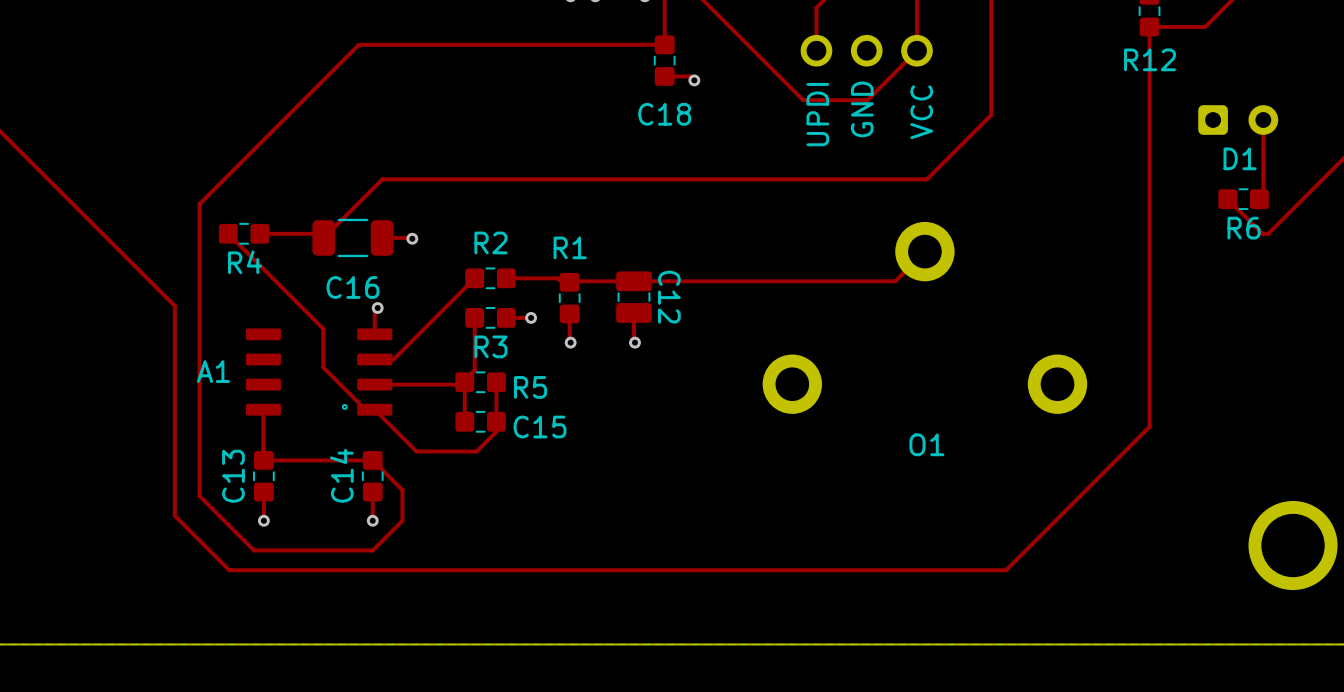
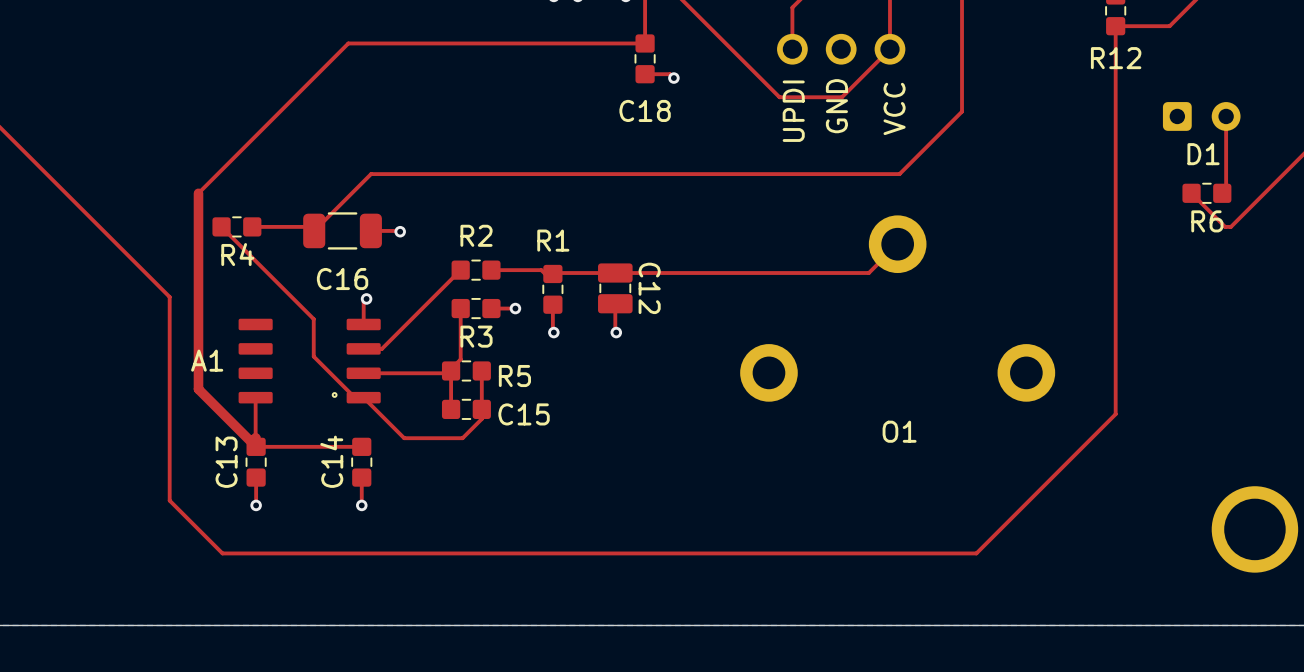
top track: (204, 199) (199, 204) (199, 496) (254, 550) (372, 550) (402, 520) (402, 490) (372, 460) -> (198, 193) (198, 389) (256, 446)

